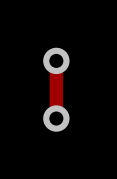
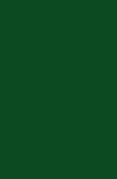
track: (56, 60) (56, 118) -> none
via: (56, 60) -> none
via: (56, 118) -> none

